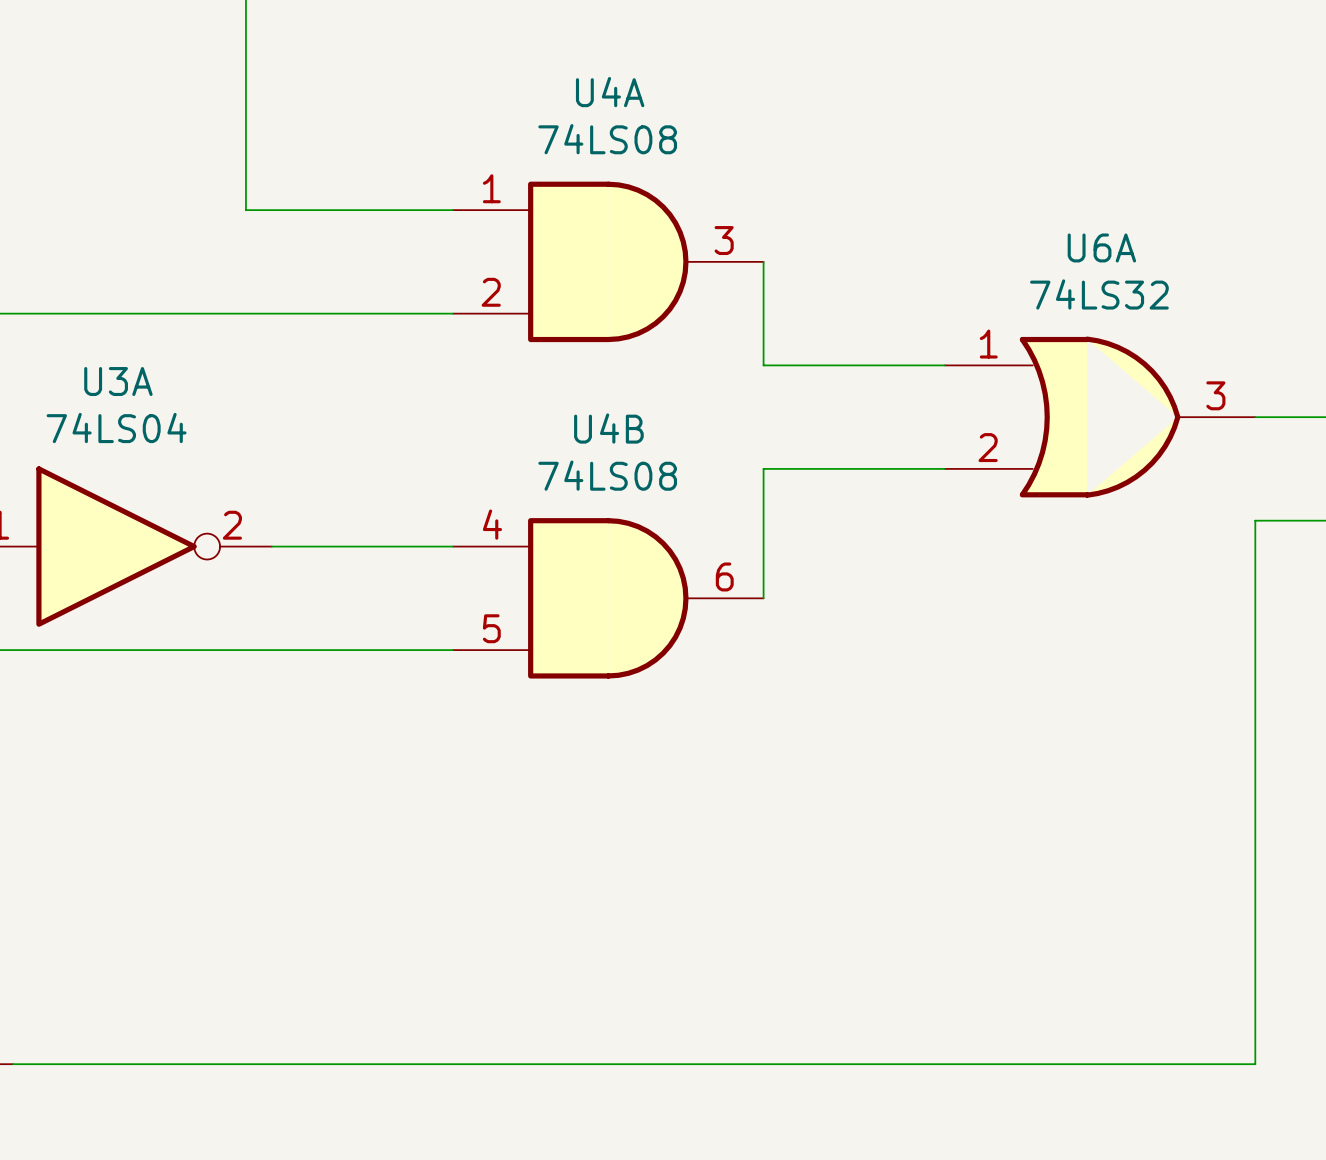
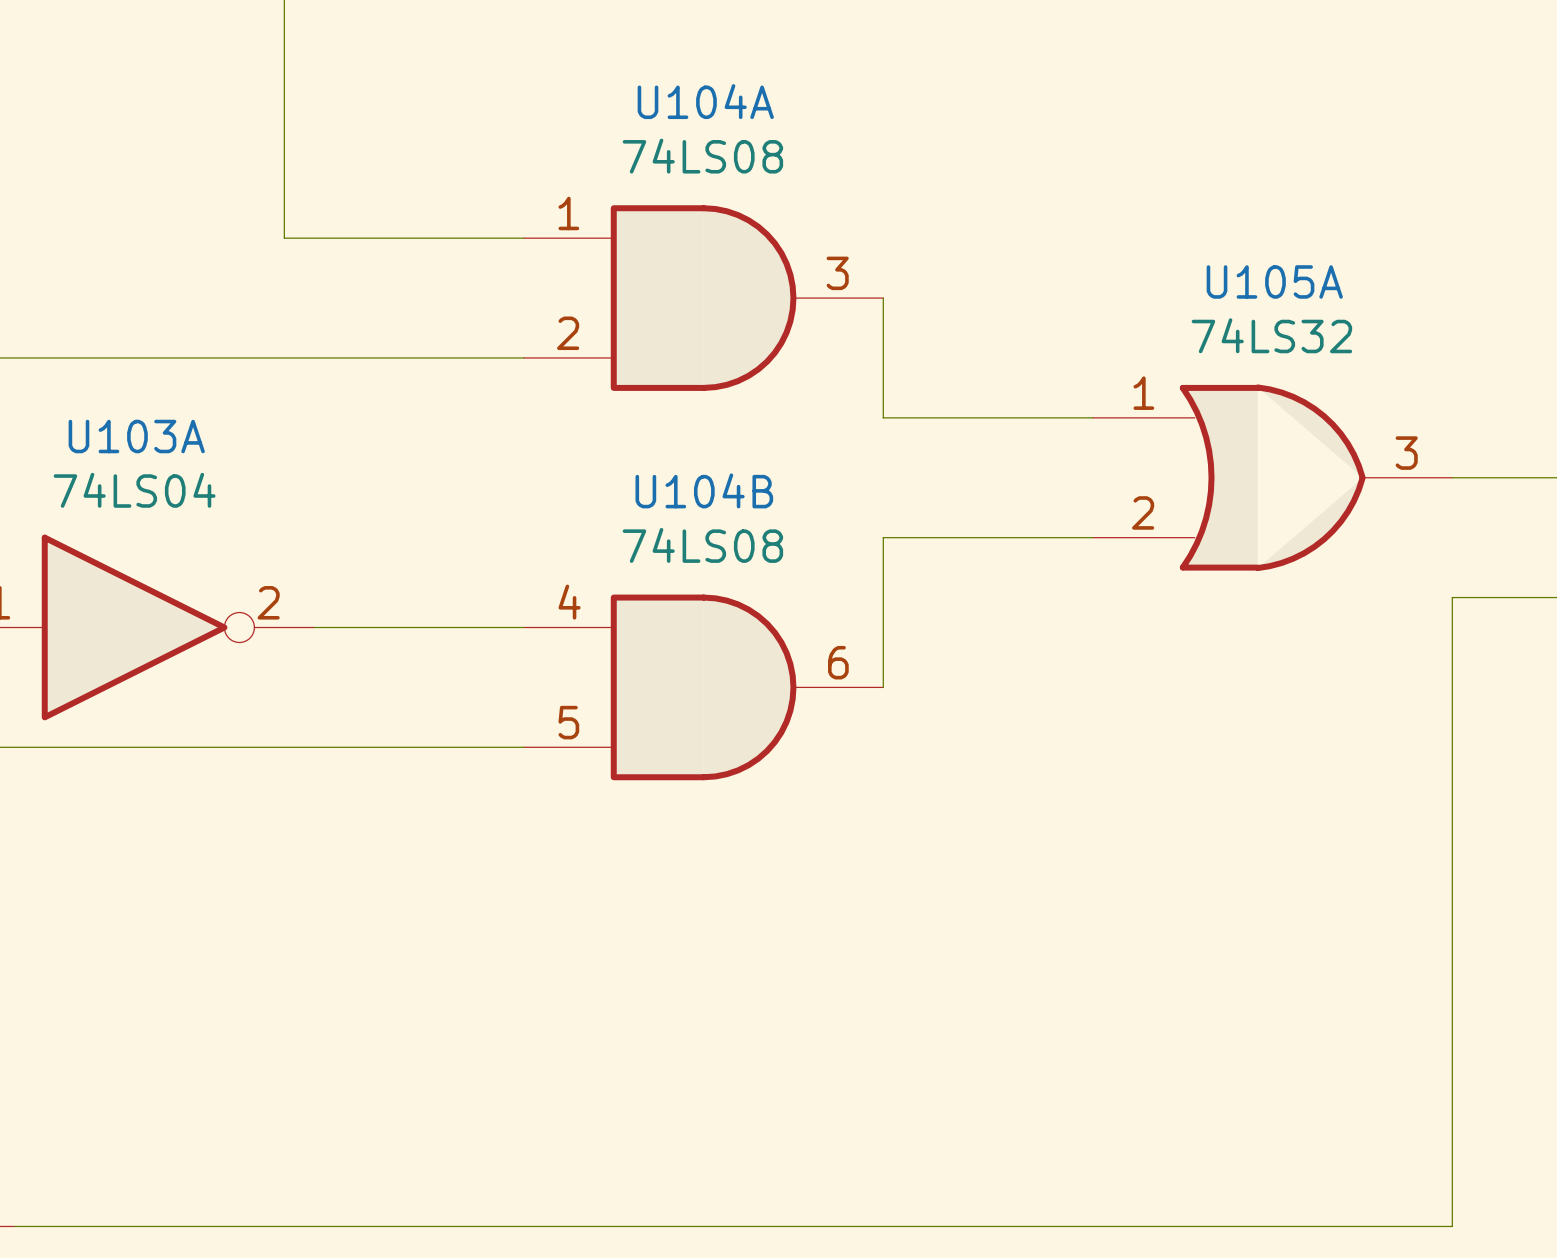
U4A name: U4A (610, 92) -> U104A (705, 101)
U6A name: U6A (1101, 247) -> U105A (1274, 281)
U3A name: U3A (118, 381) -> U103A (136, 436)
U4B name: U4B (608, 428) -> U104B (704, 490)

